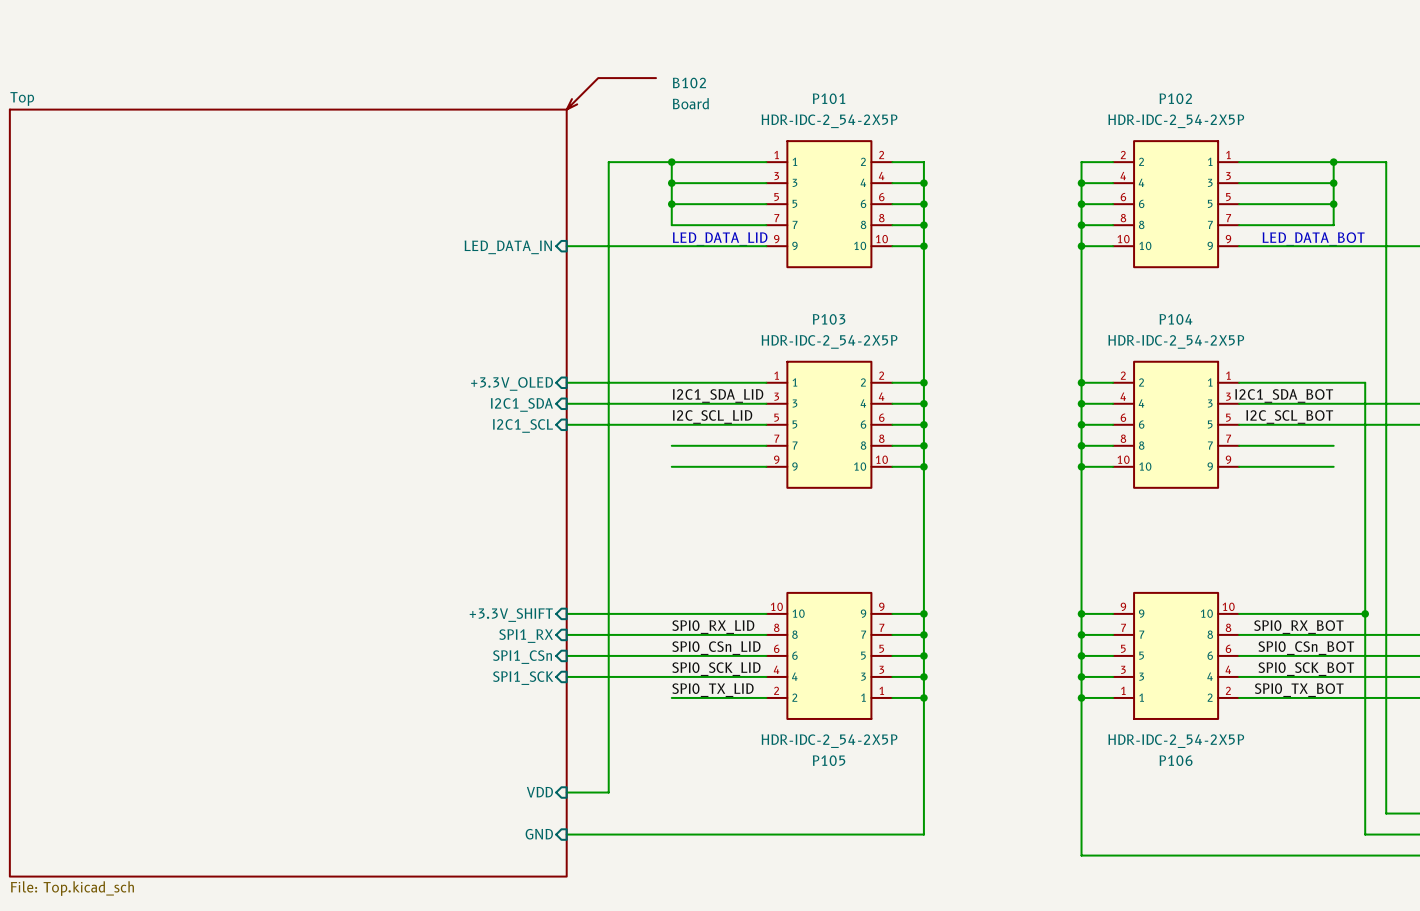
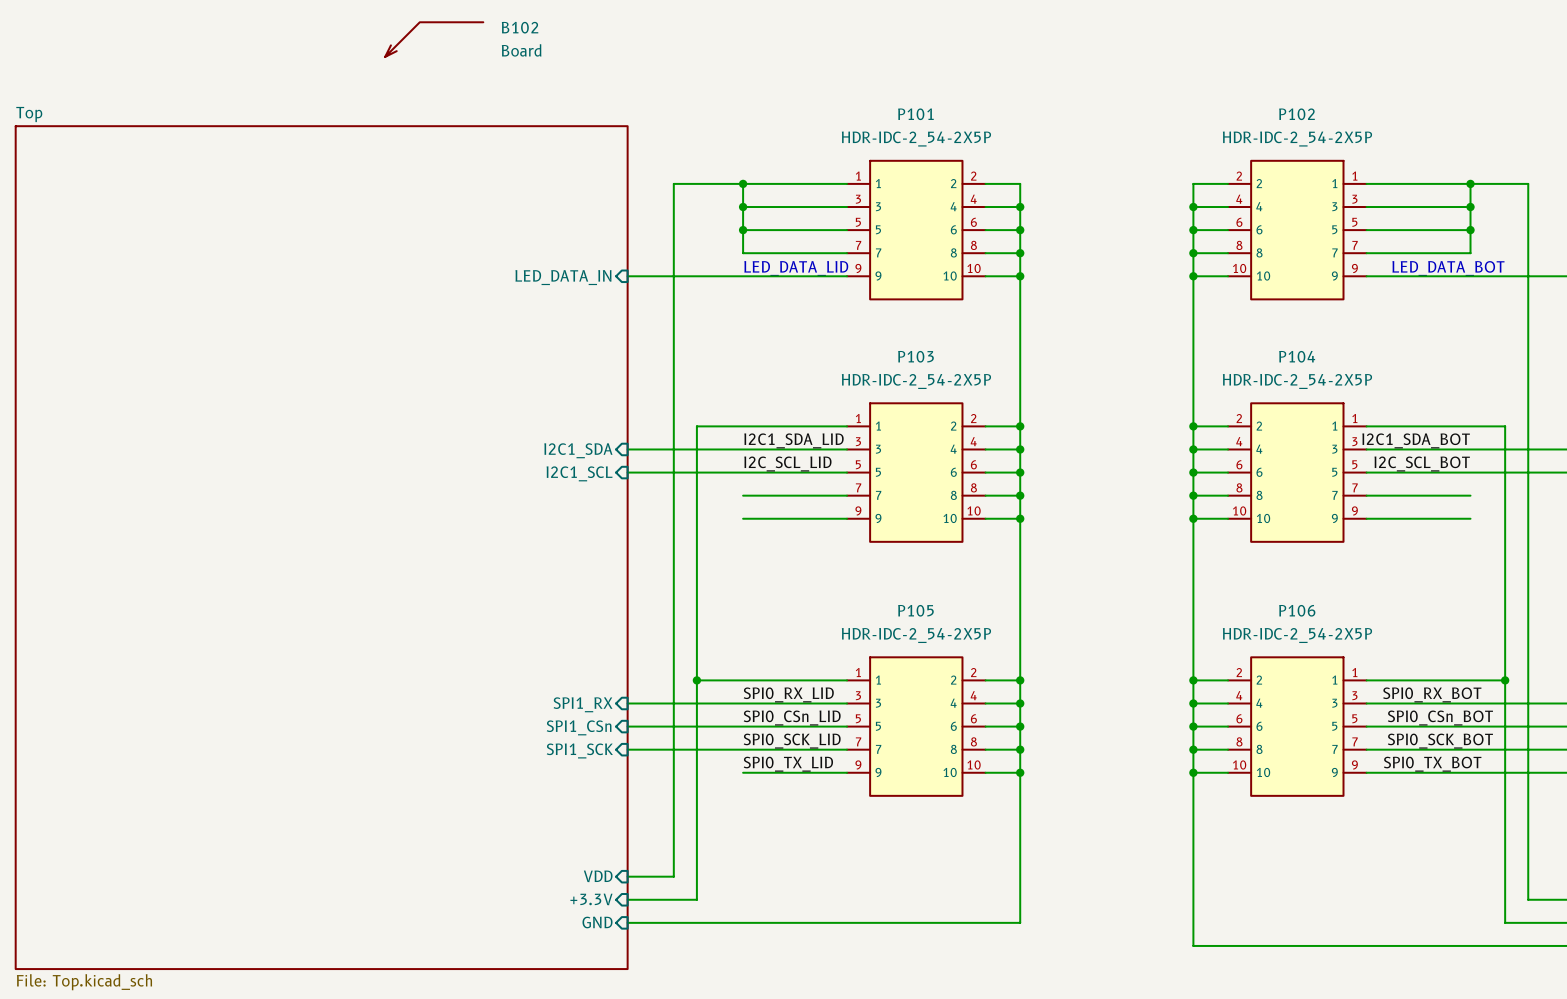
B102 position: (611, 93) -> (434, 39)
wire: (566, 382) (629, 382) -> (627, 899) (696, 899) (696, 426)
sheet pin: +3.3V_OLED (512, 383) -> none
wire: (566, 613) (629, 613) -> none
junction: none -> (696, 680)
sheet pin: +3.3V_SHIFT (511, 615) -> none
P105 rotation: 0° (829, 655) -> 180° (916, 726)
P106 rotation: 0° (1176, 655) -> 180° (1297, 726)
sheet pin: none -> +3.3V (591, 899)

